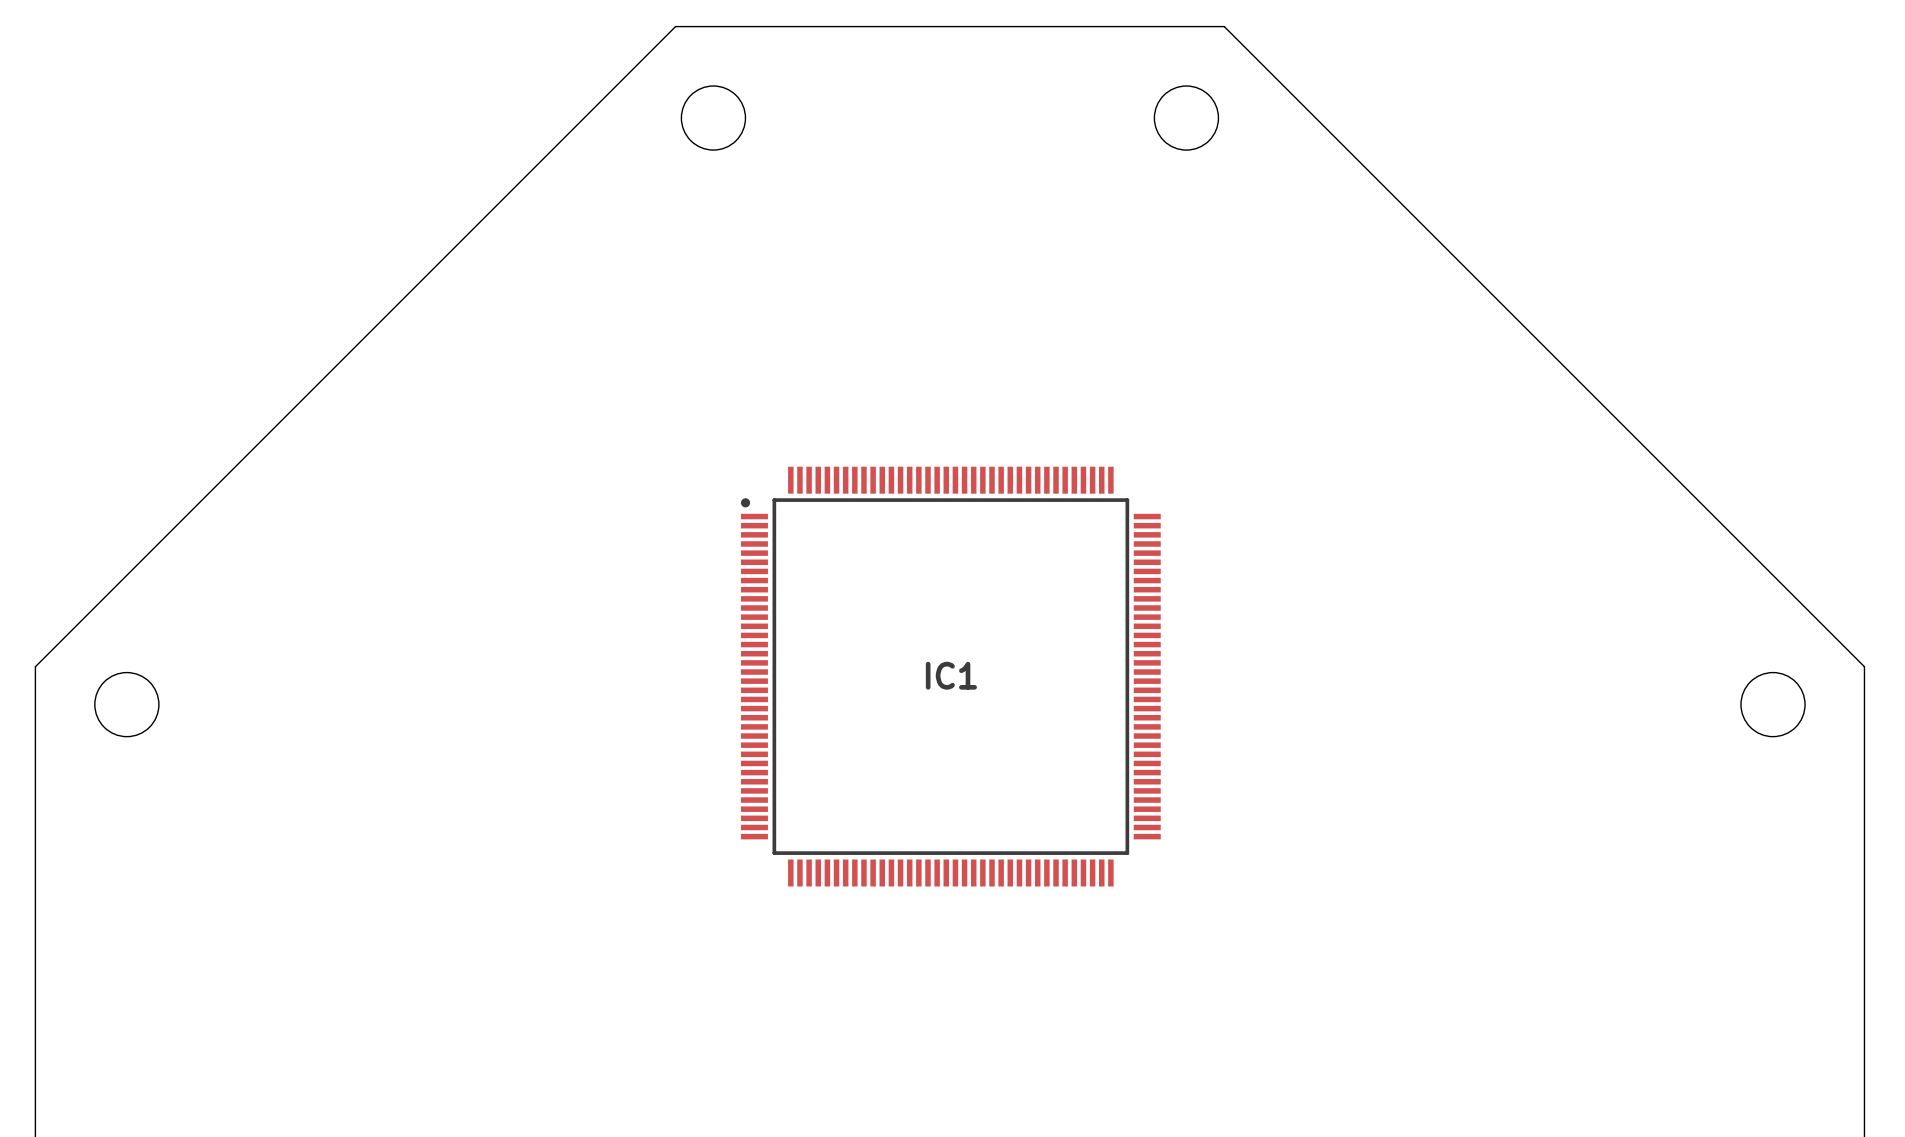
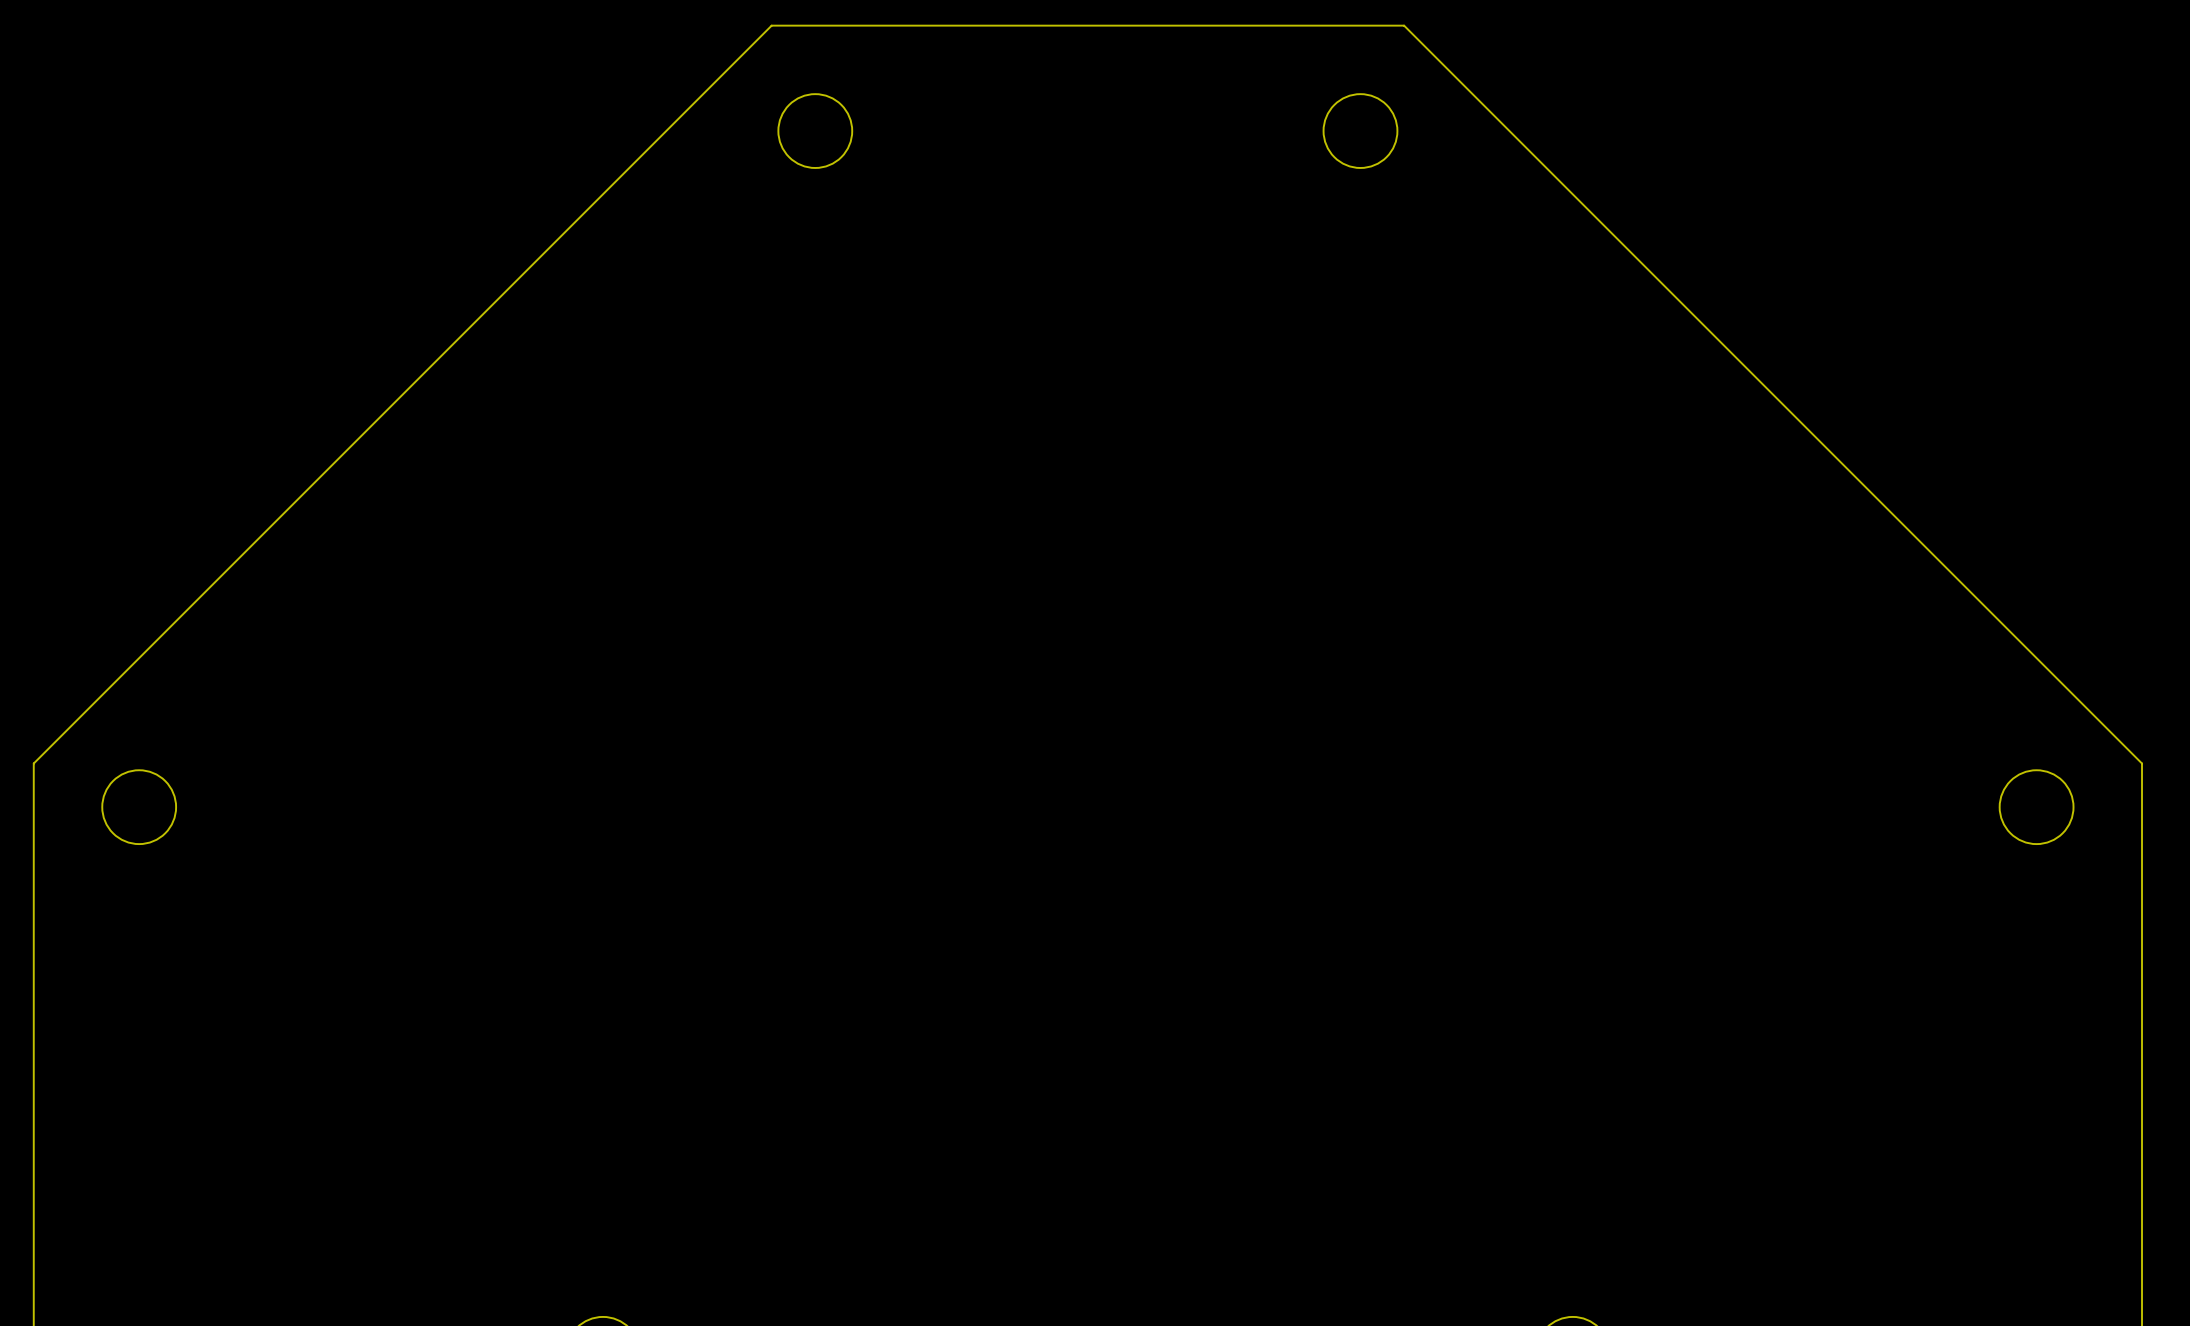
IC1: (950, 676) -> none

